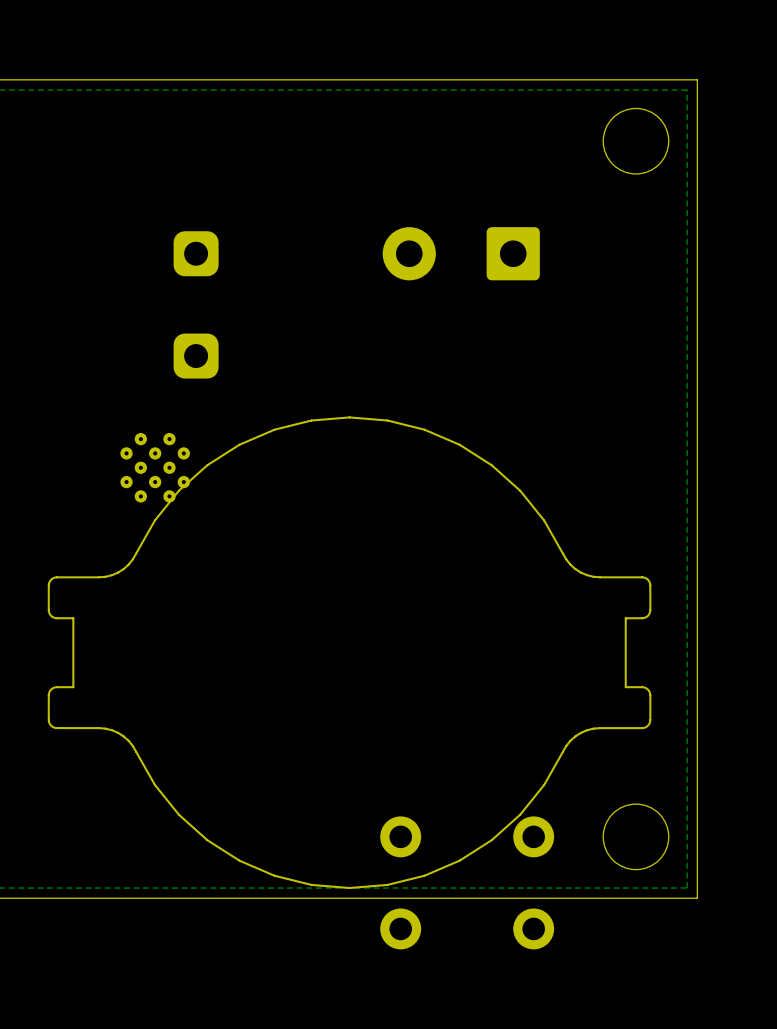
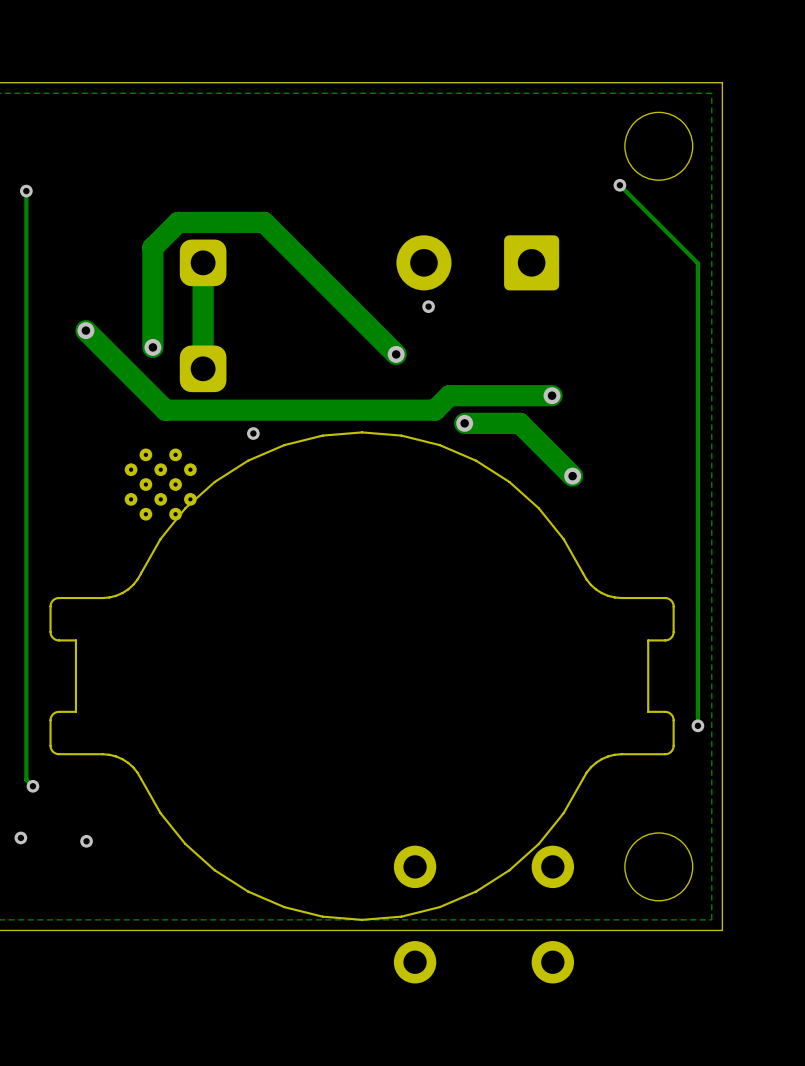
track: none -> (619, 185) (697, 263) (697, 725)
via: none -> (619, 185)
track: none -> (26, 191) (26, 779) (32, 786)
via: none -> (26, 191)
track: none -> (203, 262) (203, 368)
via: none -> (428, 306)
track: none -> (85, 330) (165, 410) (435, 410) (449, 395) (552, 395)
via: none -> (85, 330)
track: none -> (152, 347) (152, 247) (178, 222) (264, 222) (396, 354)
via: none -> (152, 347)
via: none -> (396, 354)
via: none -> (552, 395)
track: none -> (464, 423) (519, 423) (572, 476)
via: none -> (464, 423)
via: none -> (253, 433)
via: none -> (572, 476)
via: none -> (697, 725)
via: none -> (32, 786)
via: none -> (20, 837)
via: none -> (86, 841)

